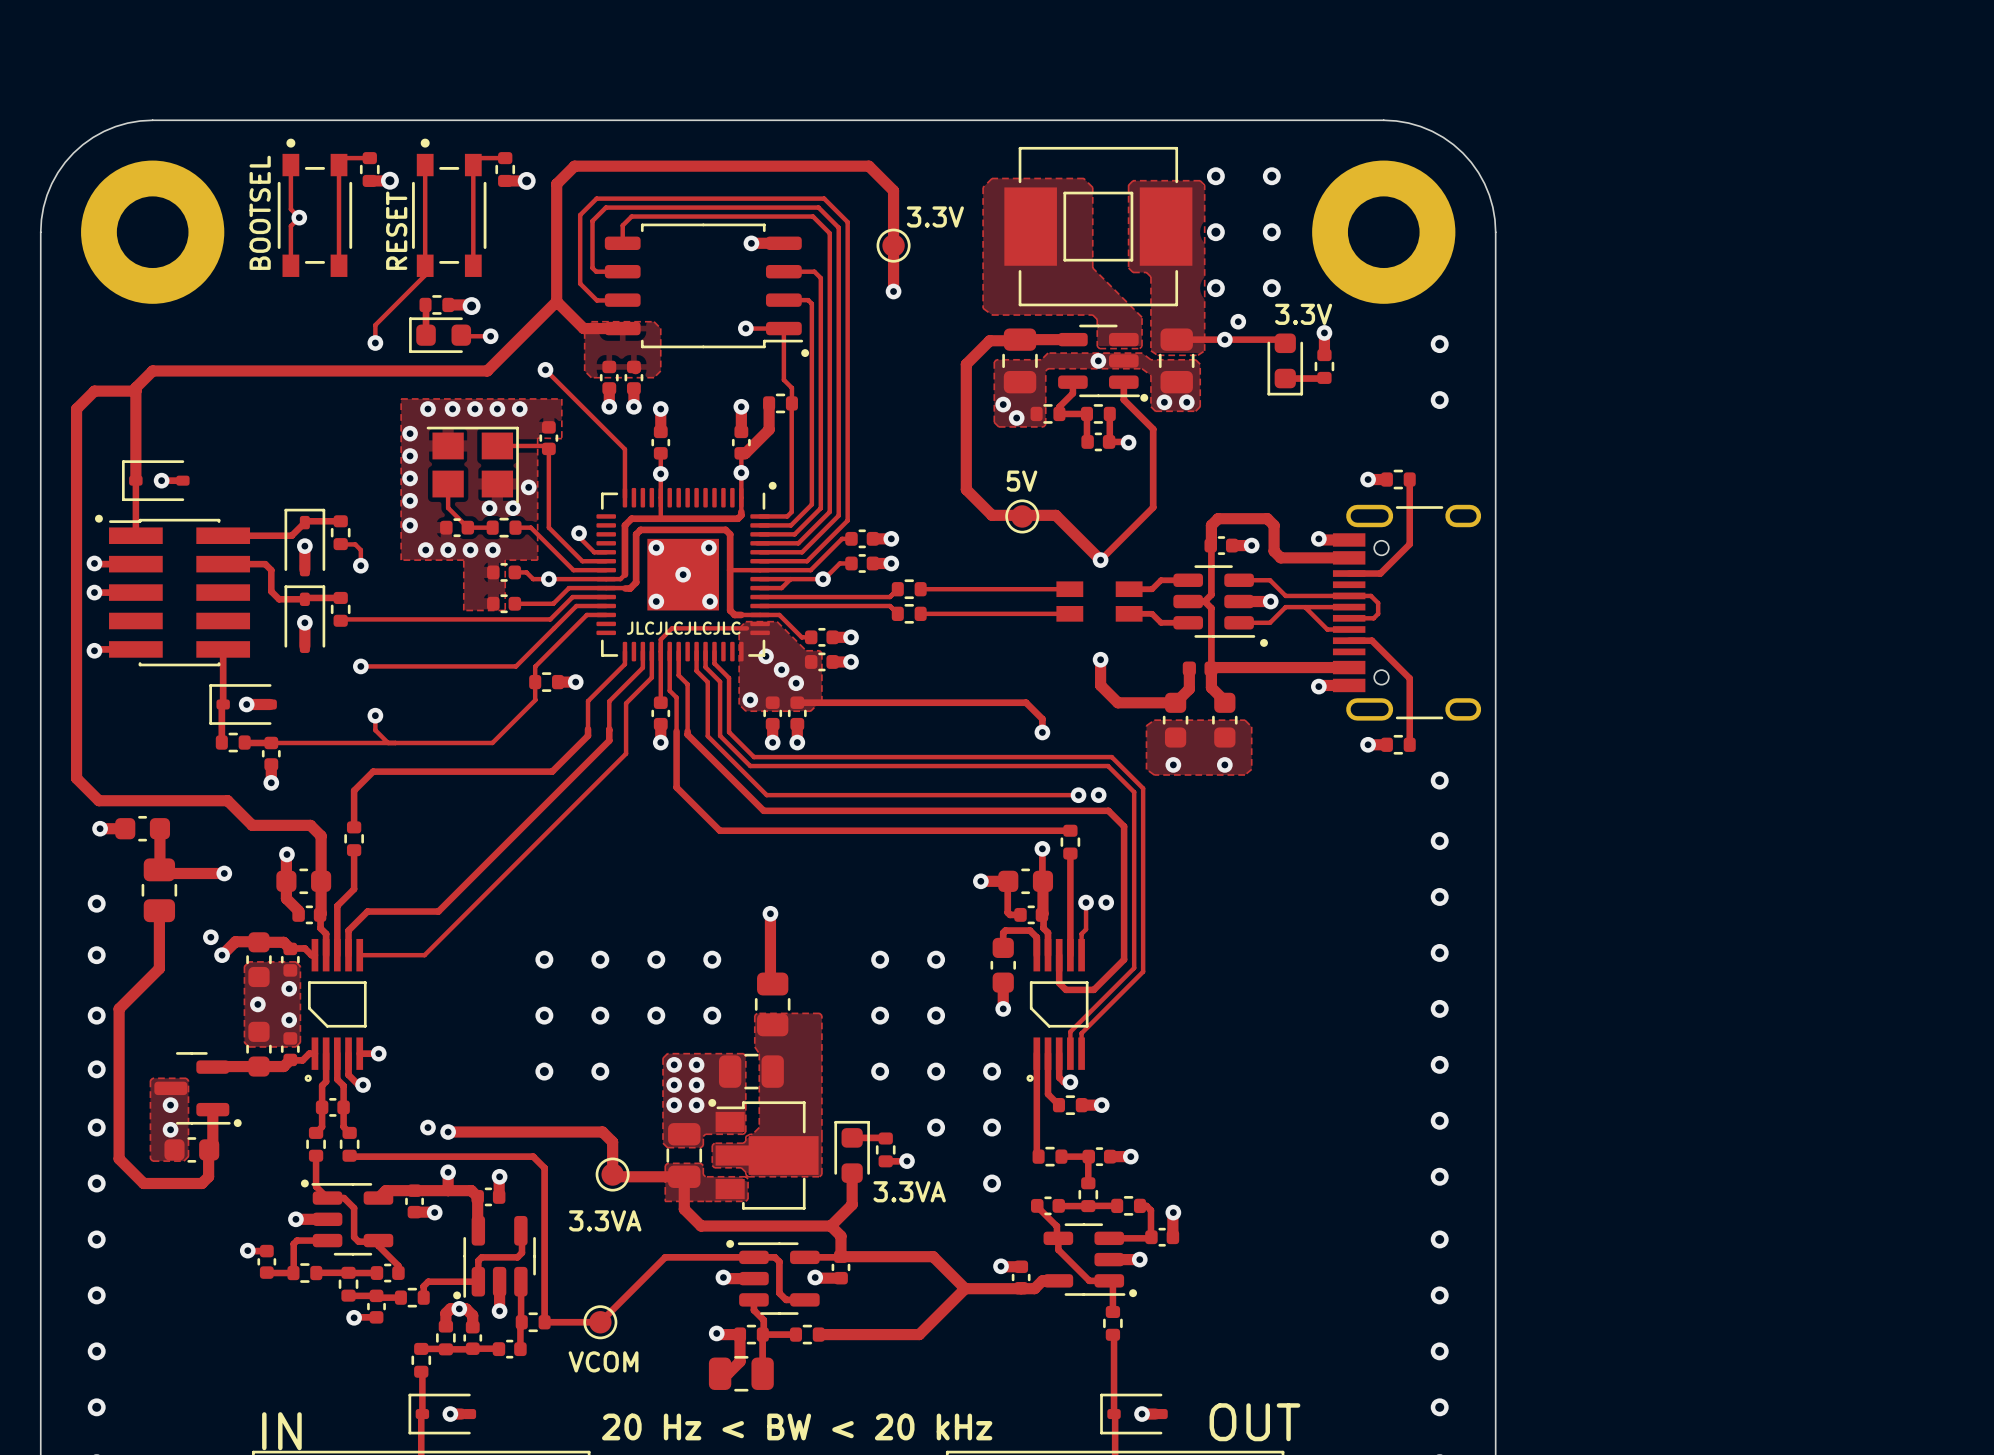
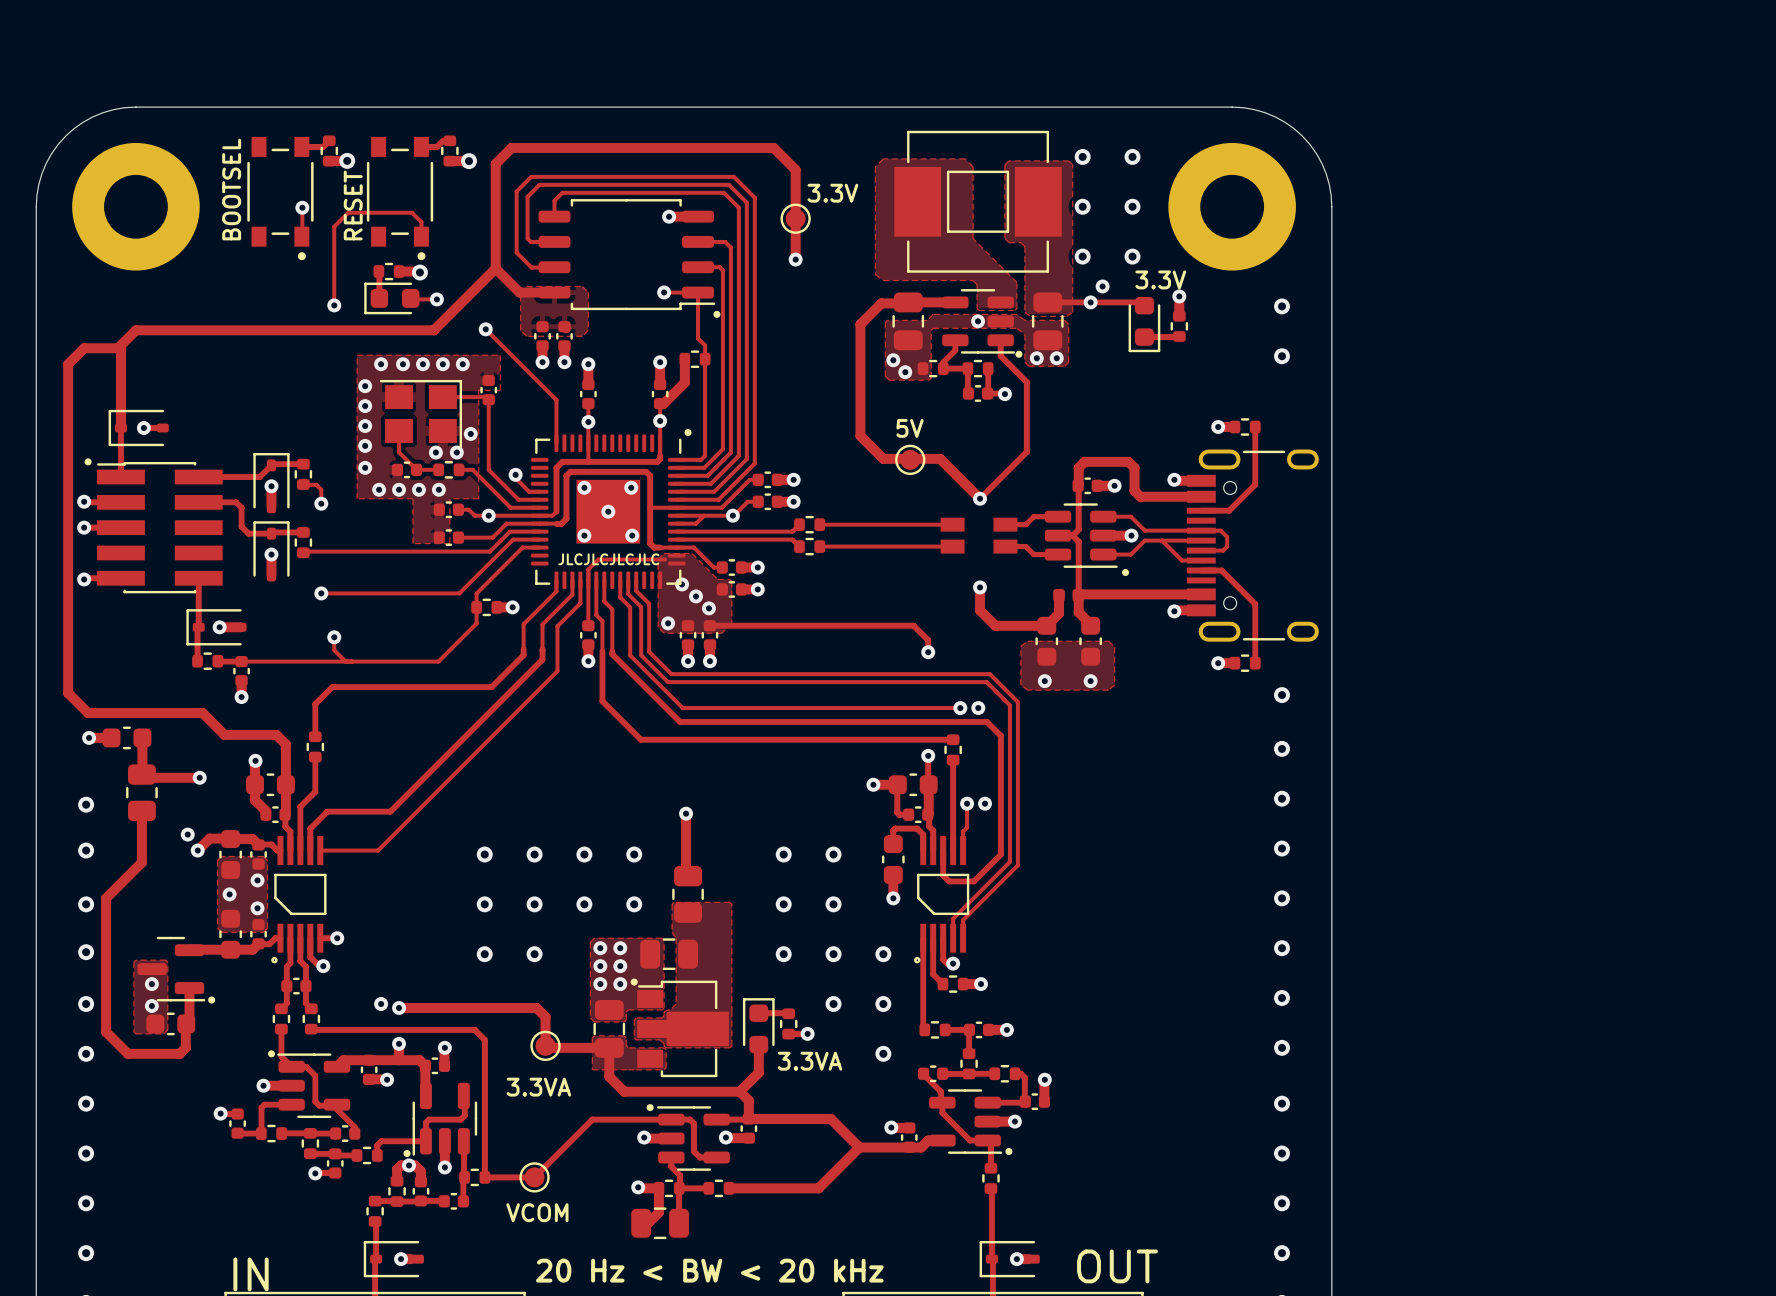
track: (369, 158) (345, 158) (339, 165) (339, 265) -> (302, 207) (301, 236)
track: none -> (329, 140) (323, 146) (301, 146)
track: (497, 158) (480, 158) (473, 165) (473, 249) -> (443, 140) (436, 146) (421, 146)
track: (290, 165) (290, 209) (299, 217) (290, 226) (290, 265) -> none
track: (425, 165) (425, 275) (375, 325) -> (421, 222) (411, 212) (348, 212) (334, 226) (334, 289)
part rotation: 0° (314, 207) -> 180° (280, 198)
part rotation: 0° (449, 207) -> 180° (400, 198)
via position: (299, 217) -> (302, 207)

